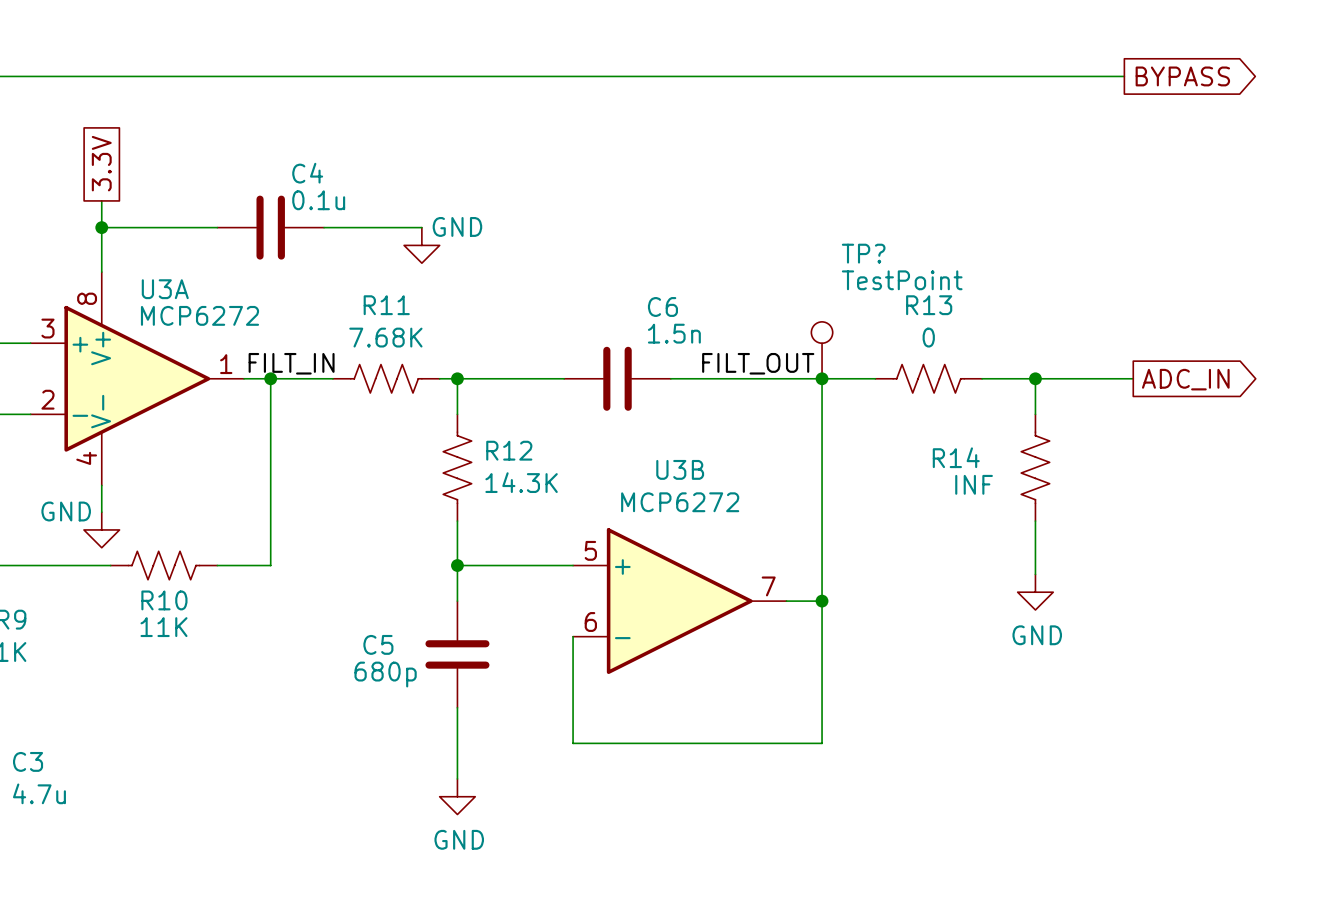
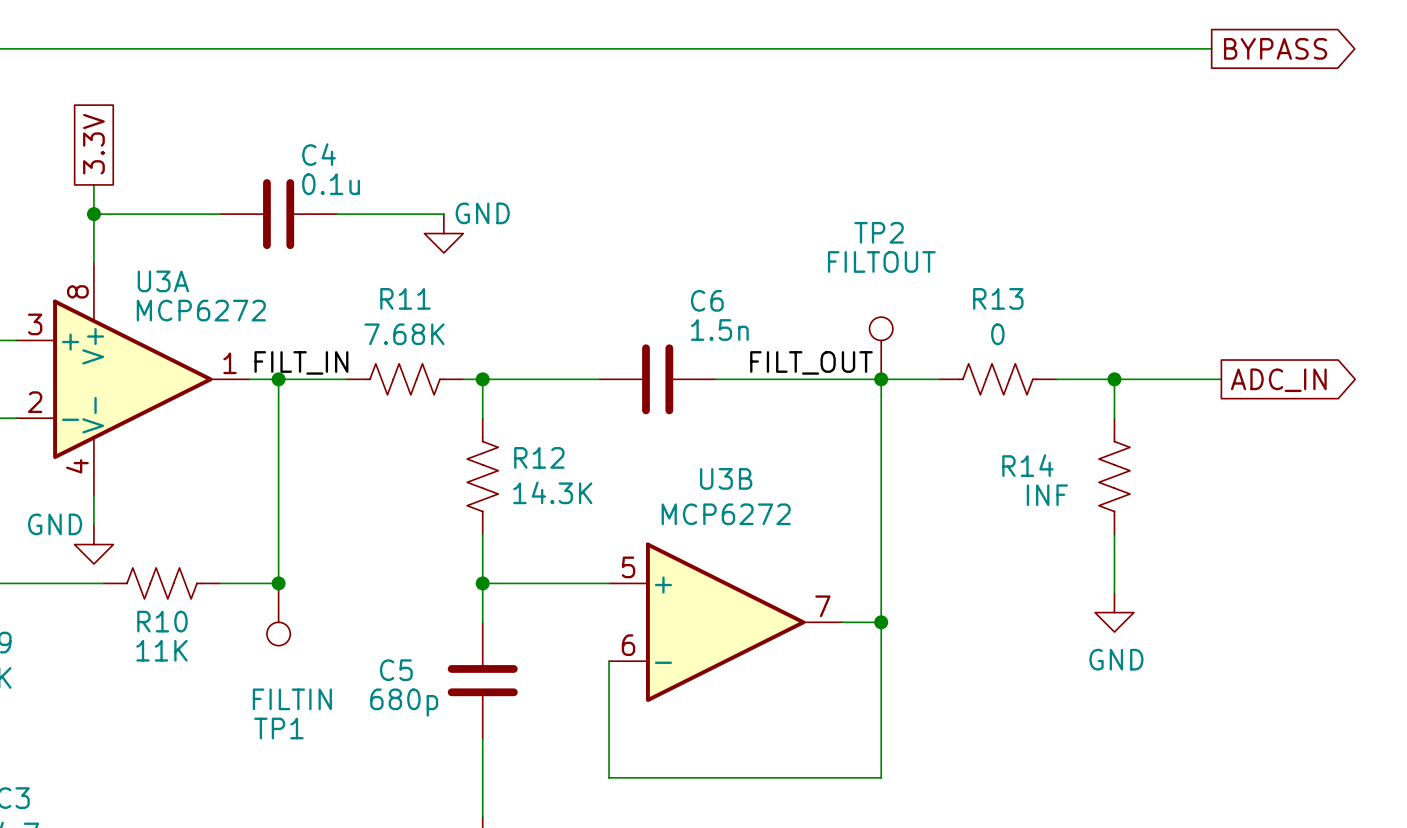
TP? name: TP? (863, 253) -> TP2 (879, 232)
TP? value: TestPoint (902, 280) -> FILTOUT (881, 261)
junction: none -> (278, 583)
TP1: none -> FILTIN (278, 614)

